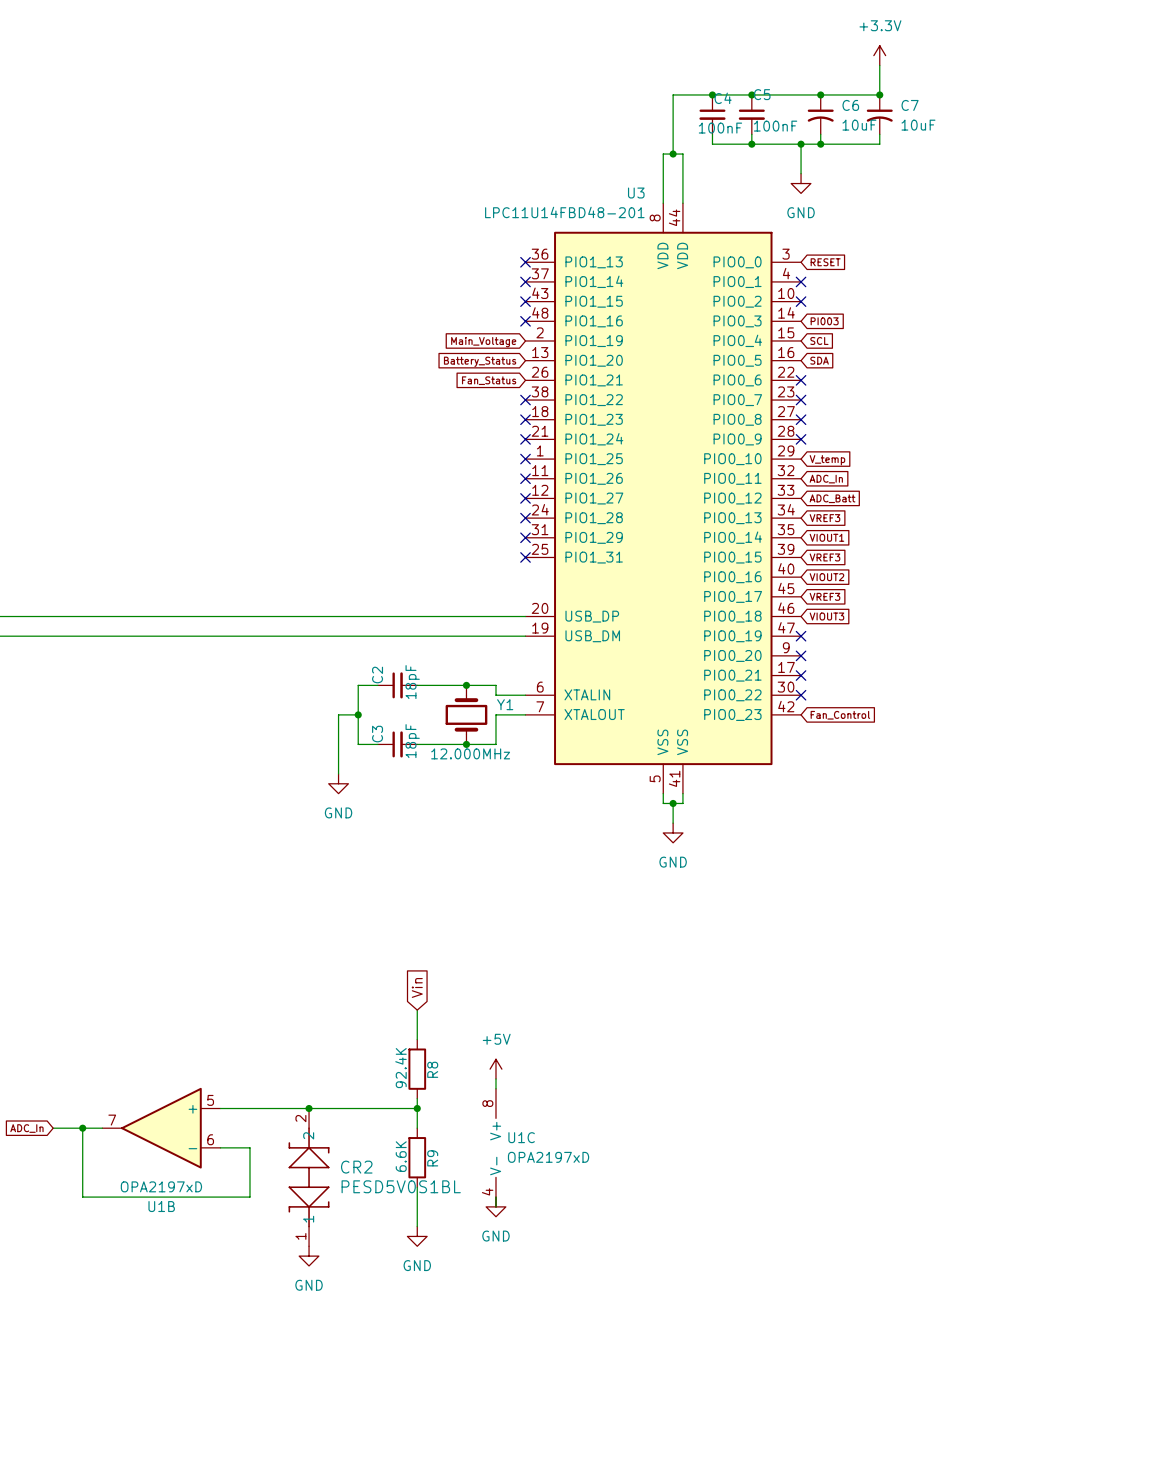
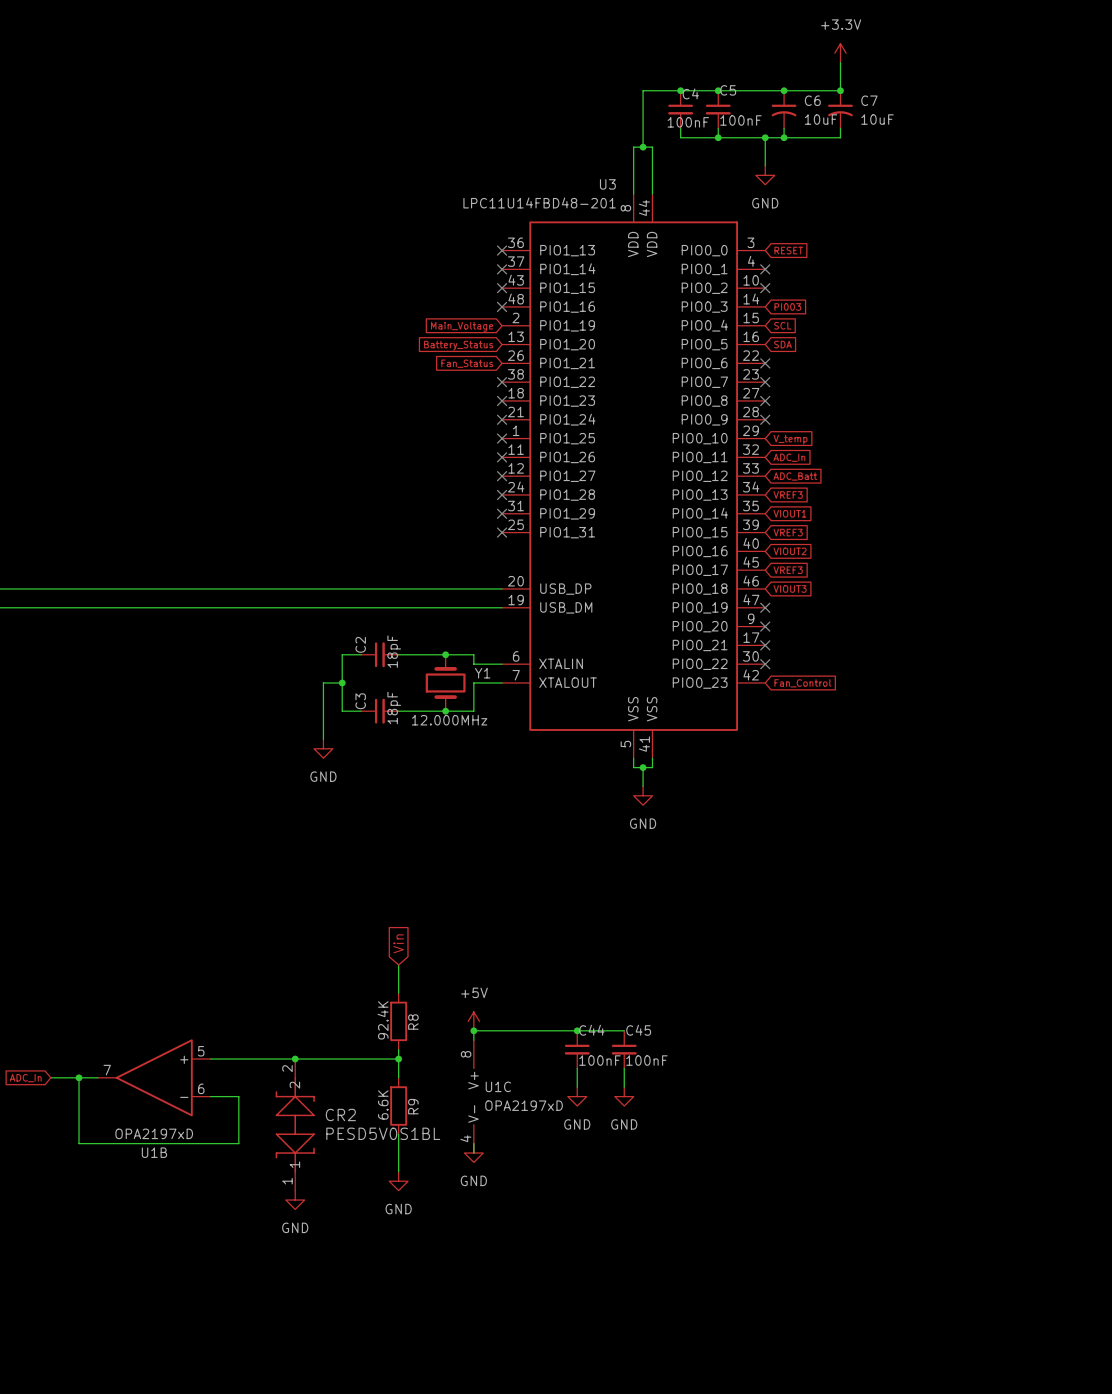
wire: none -> (473, 1030) (624, 1030)
junction: none -> (473, 1030)
junction: none -> (577, 1030)
C44: none -> 100nF (577, 1049)
C45: none -> 100nF (624, 1049)
wire: none -> (577, 1068) (577, 1087)
wire: none -> (624, 1068) (624, 1087)
power symbol: none -> GND (577, 1096)
power symbol: none -> GND (624, 1096)

